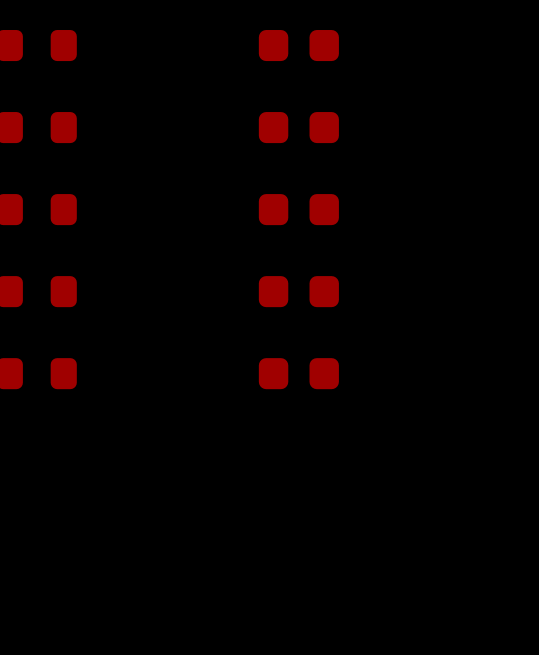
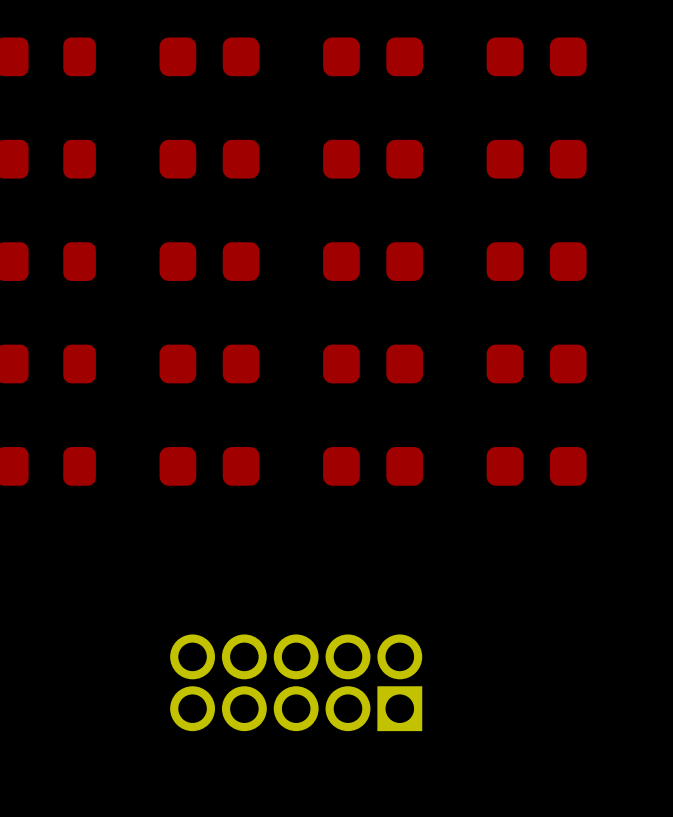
part: none -> (209, 56)
part: none -> (536, 56)
part: none -> (209, 159)
part: none -> (536, 159)
part: none -> (209, 261)
part: none -> (536, 261)
part: none -> (209, 363)
part: none -> (536, 363)
part: none -> (209, 466)
part: none -> (536, 466)
part: none -> (296, 682)

